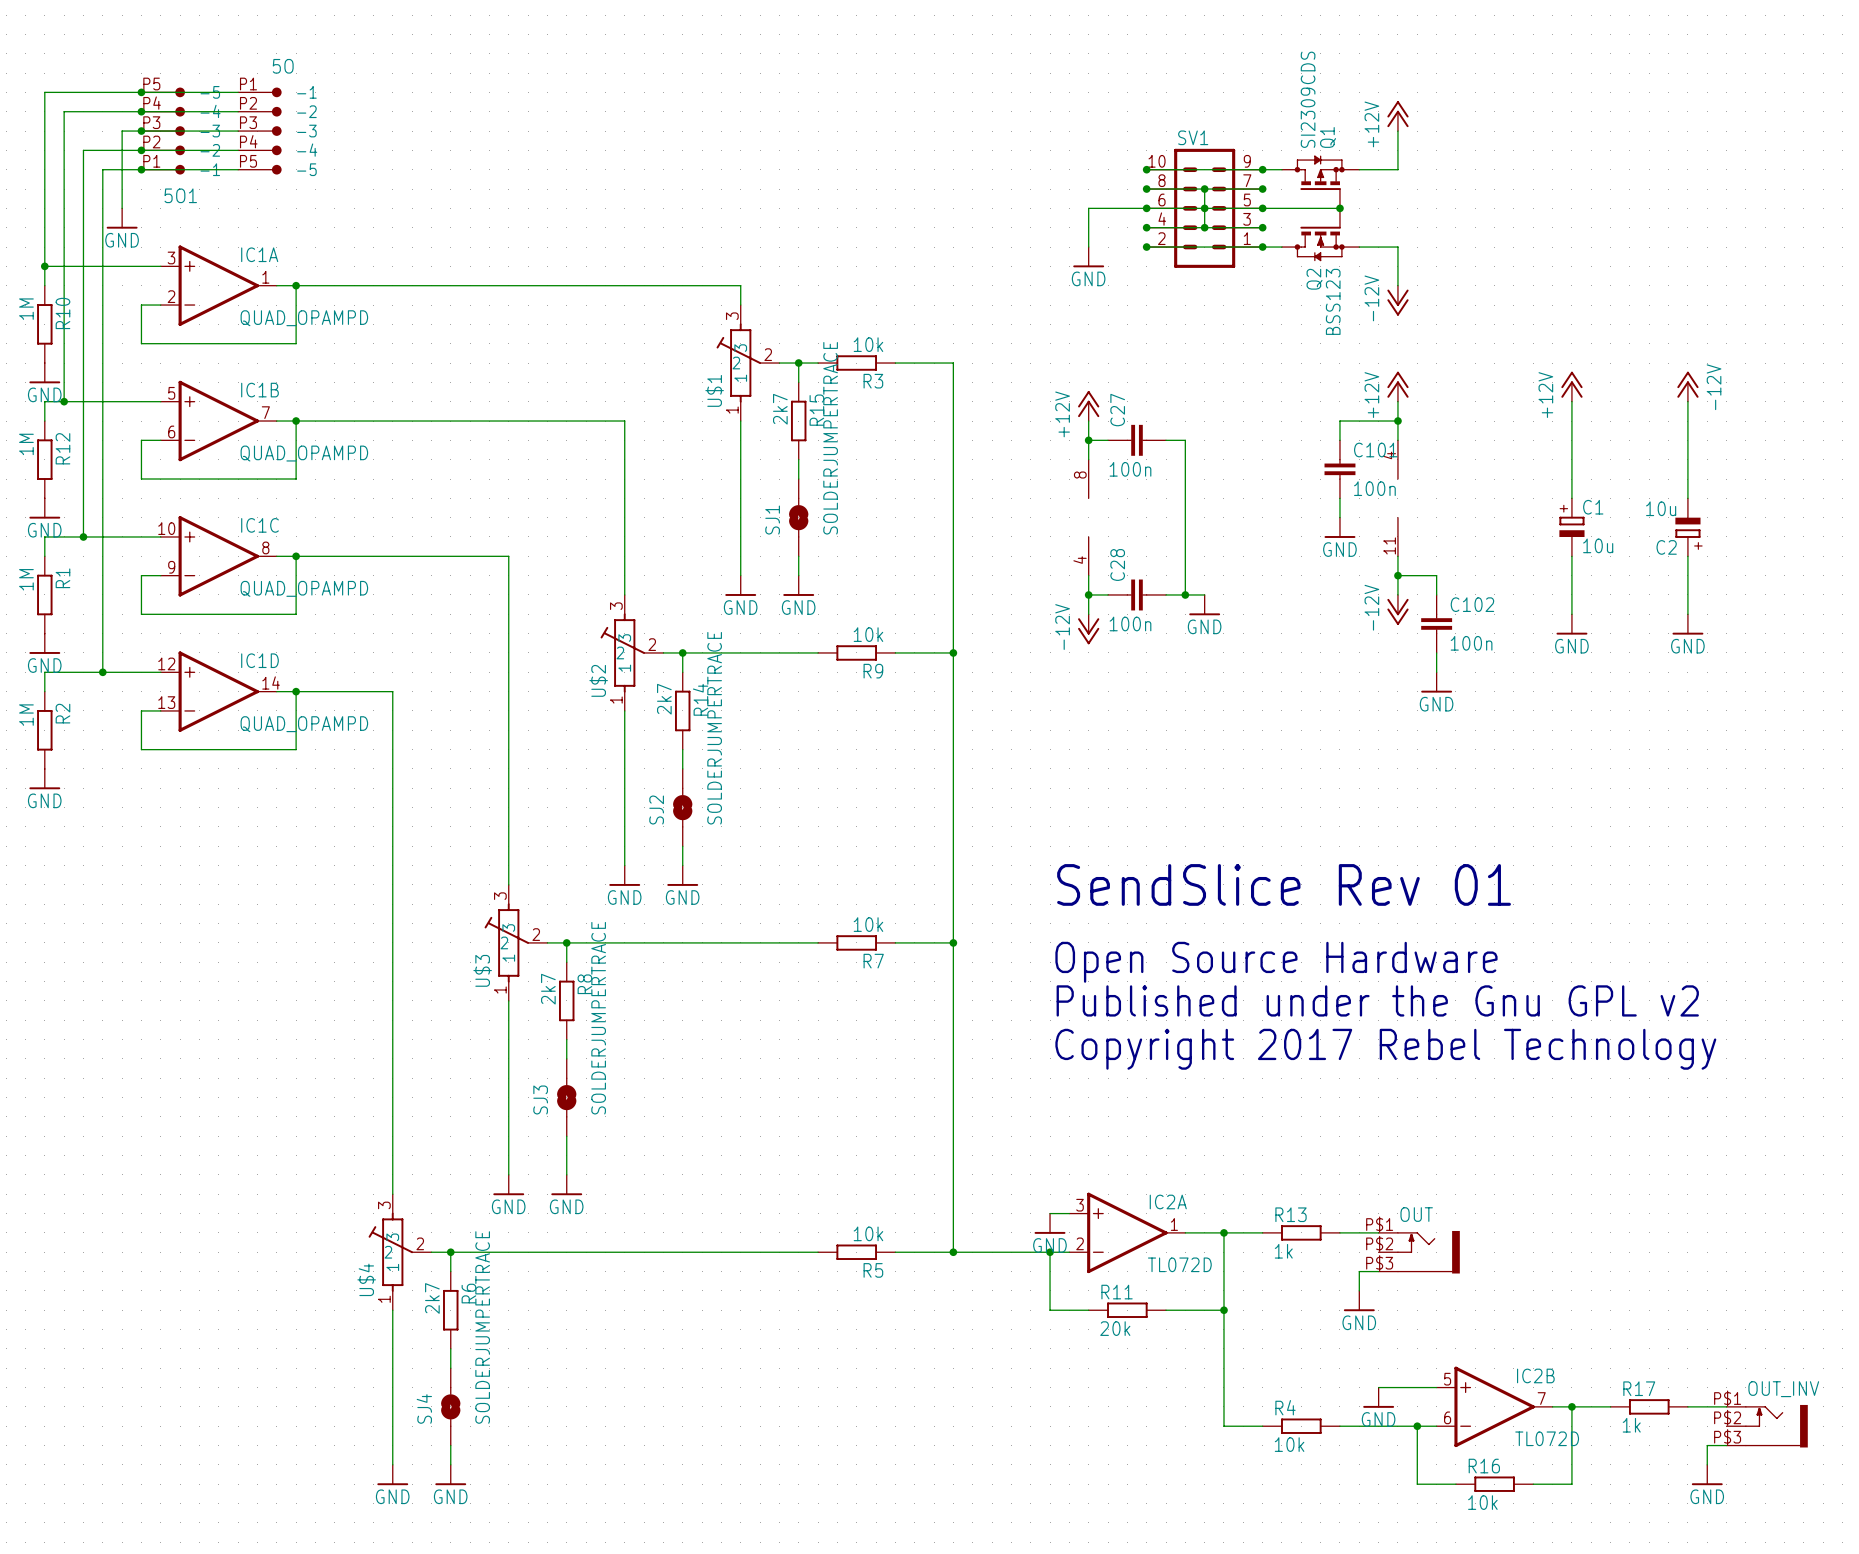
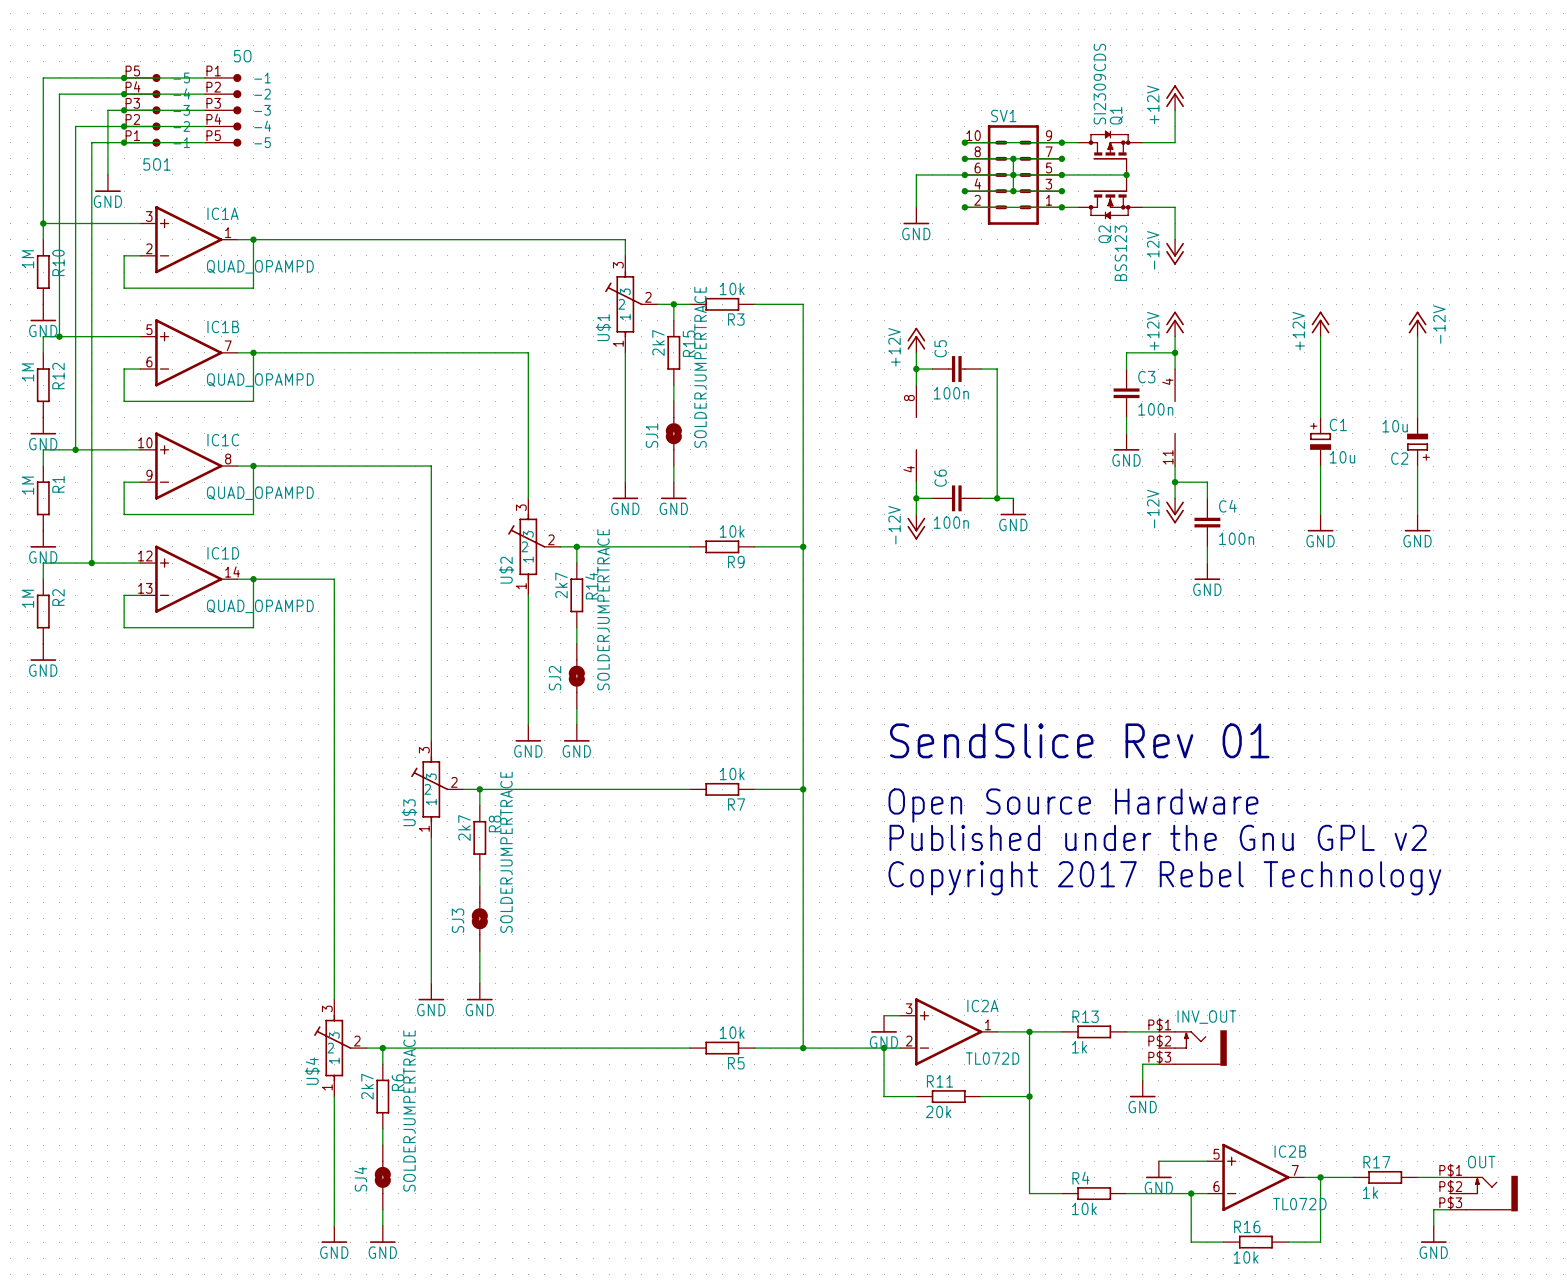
C27 name: C27 (1117, 410) -> C5 (940, 348)
C101 name: C101 (1375, 450) -> C3 (1146, 377)
C28 name: C28 (1117, 564) -> C6 (940, 478)
C102 name: C102 (1472, 604) -> C4 (1227, 506)
OUT name: OUT (1416, 1214) -> INV_OUT (1206, 1017)
OUT_INV name: OUT_INV (1783, 1389) -> OUT (1481, 1162)

